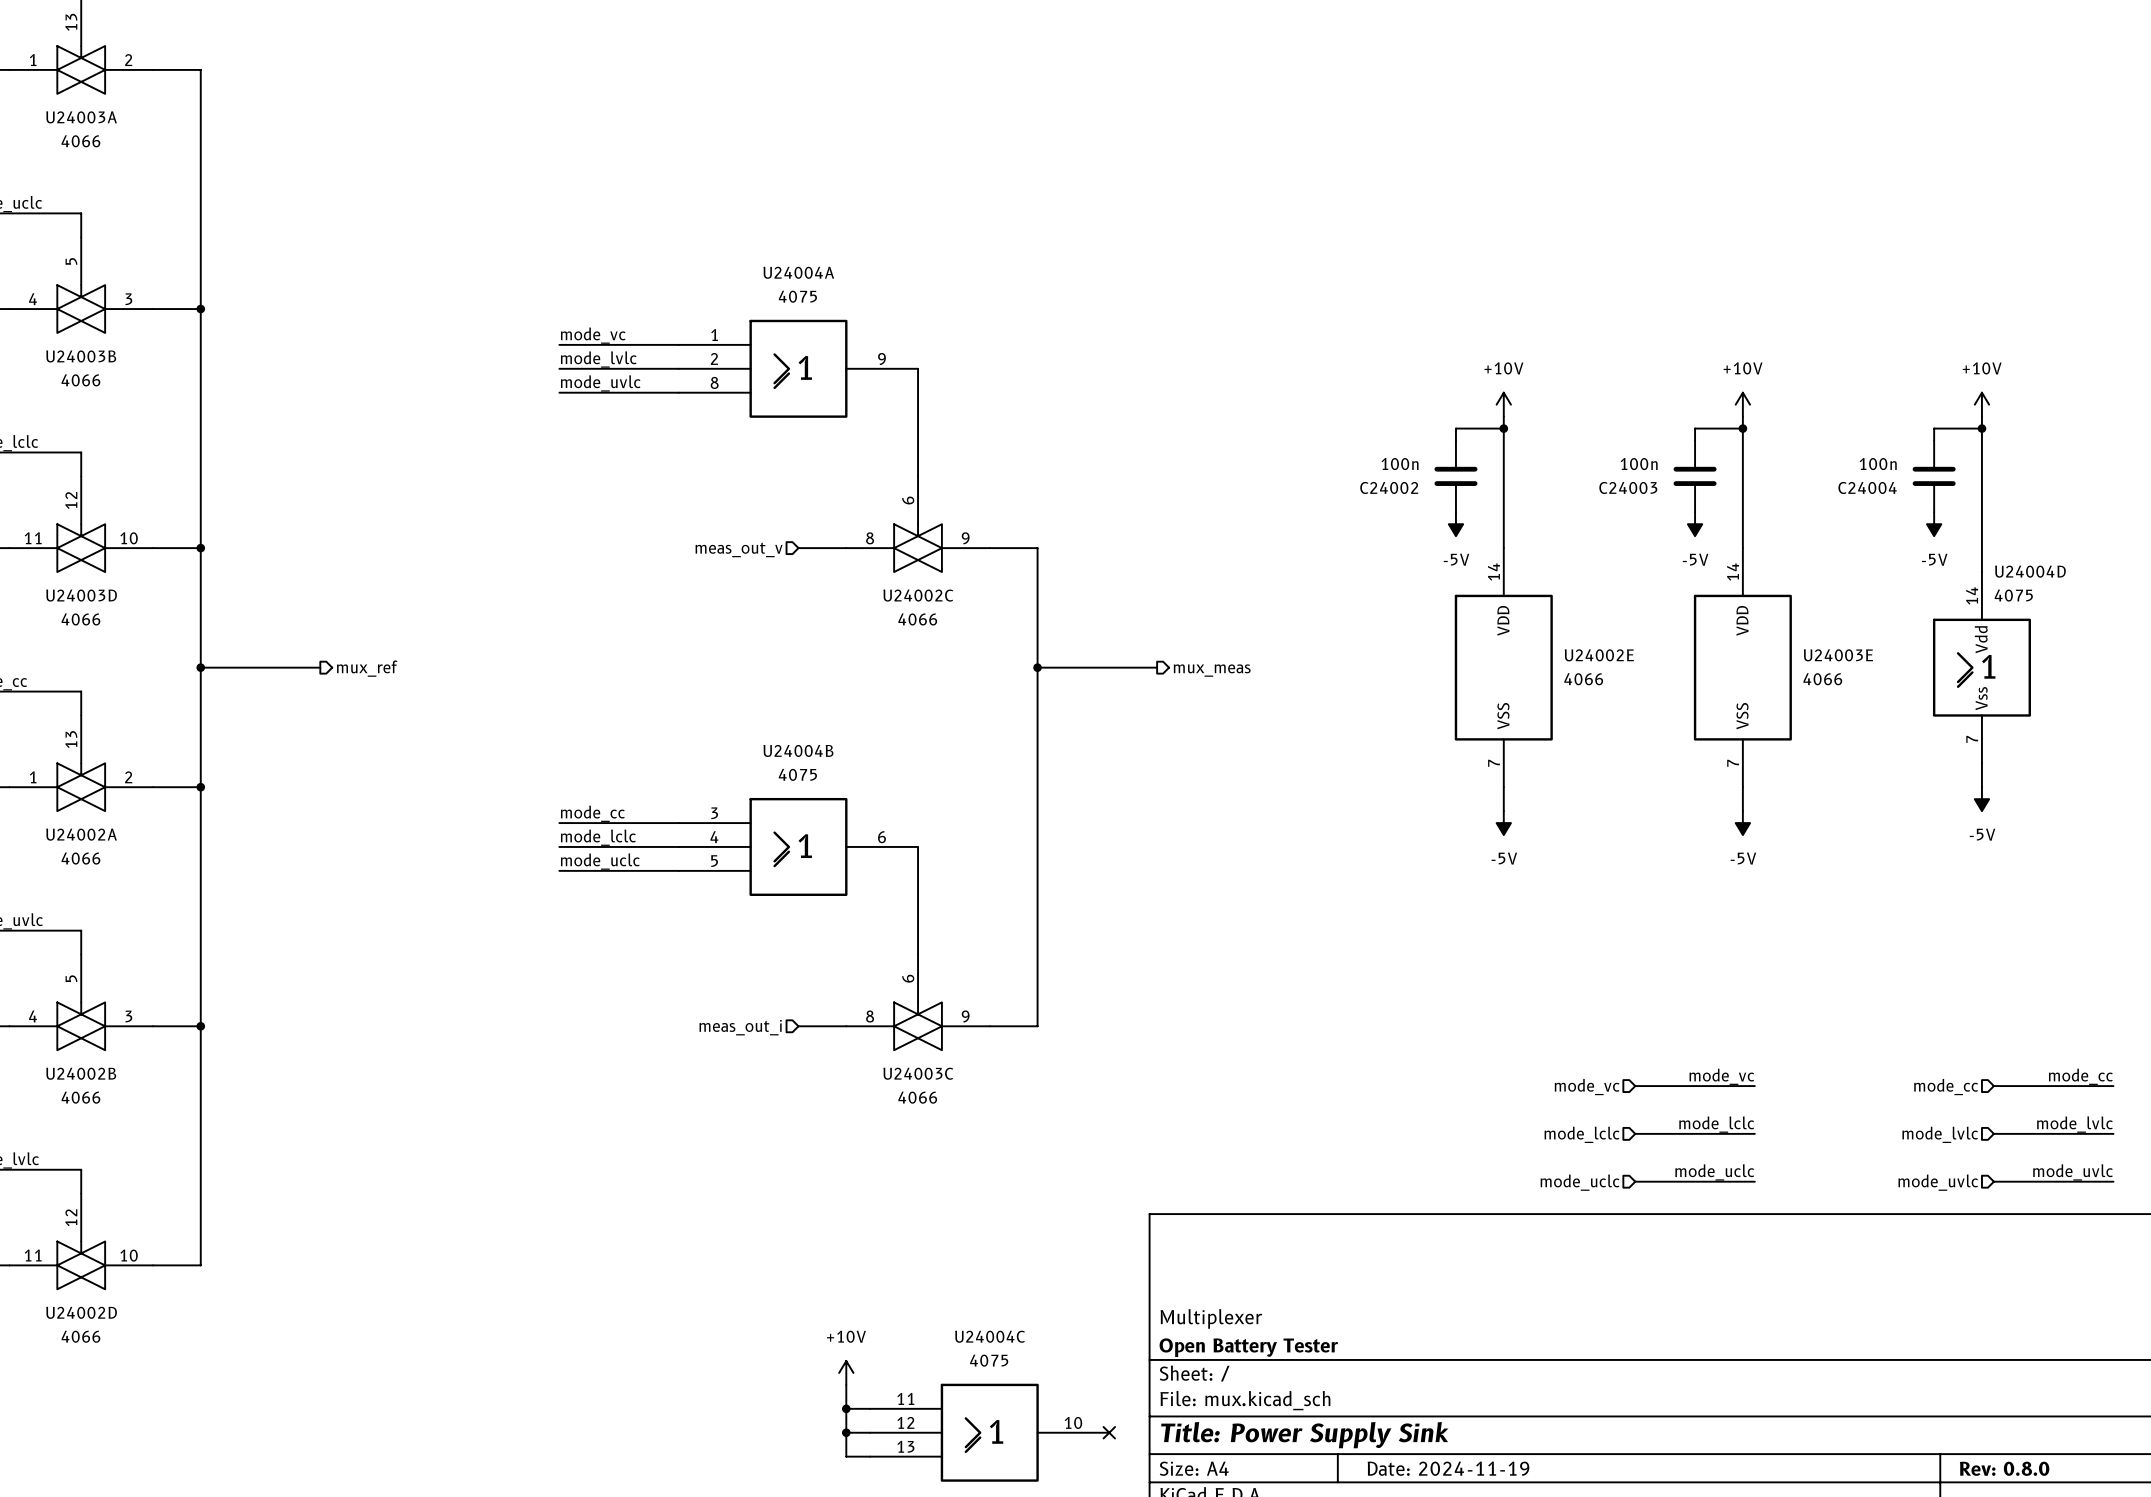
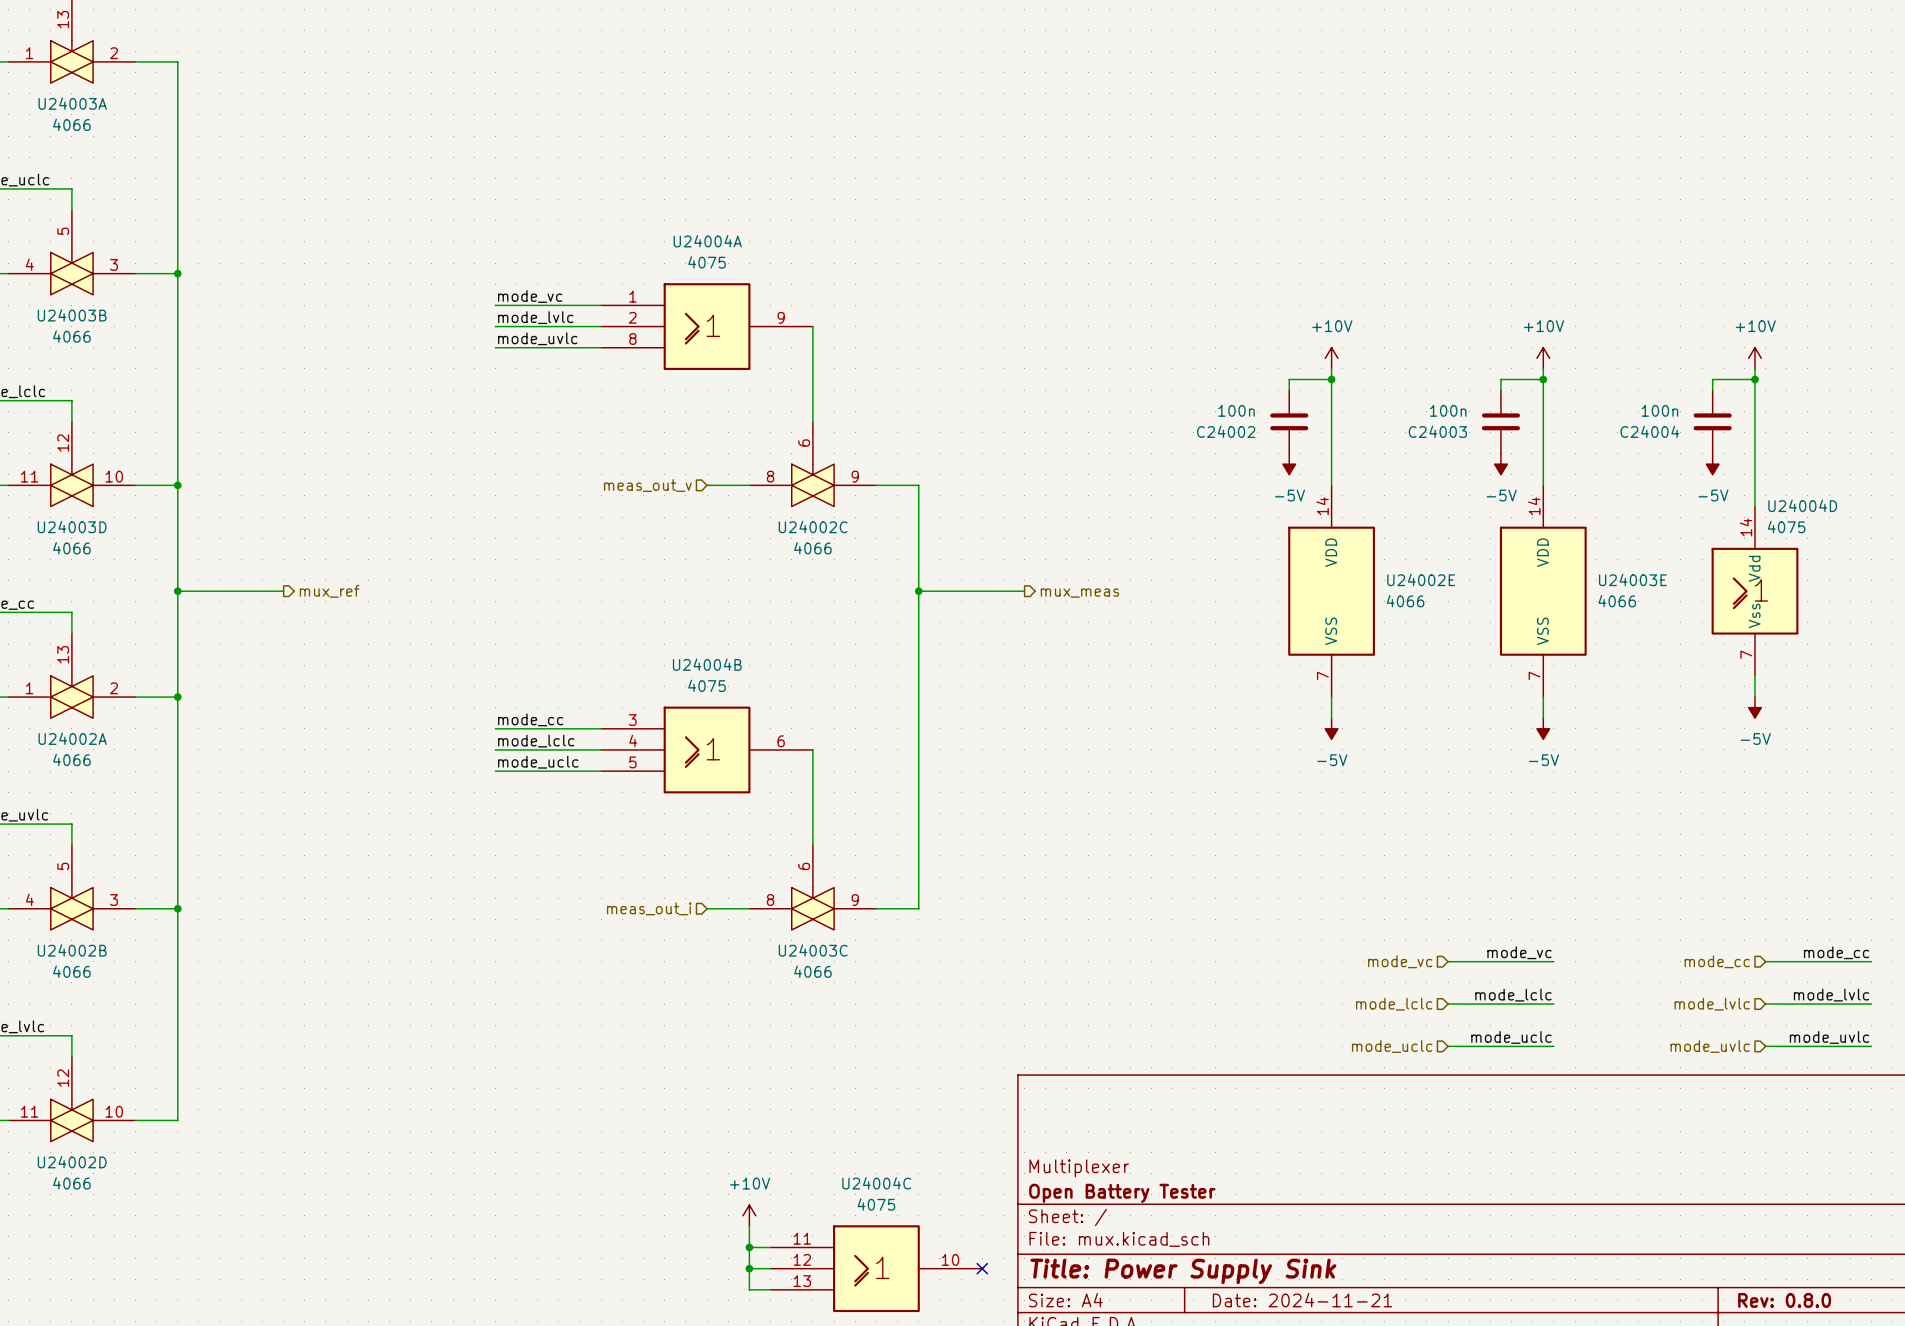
title block: Date: 2024-11-19 (1448, 1468) -> Date: 2024-11-21 (1302, 1300)

